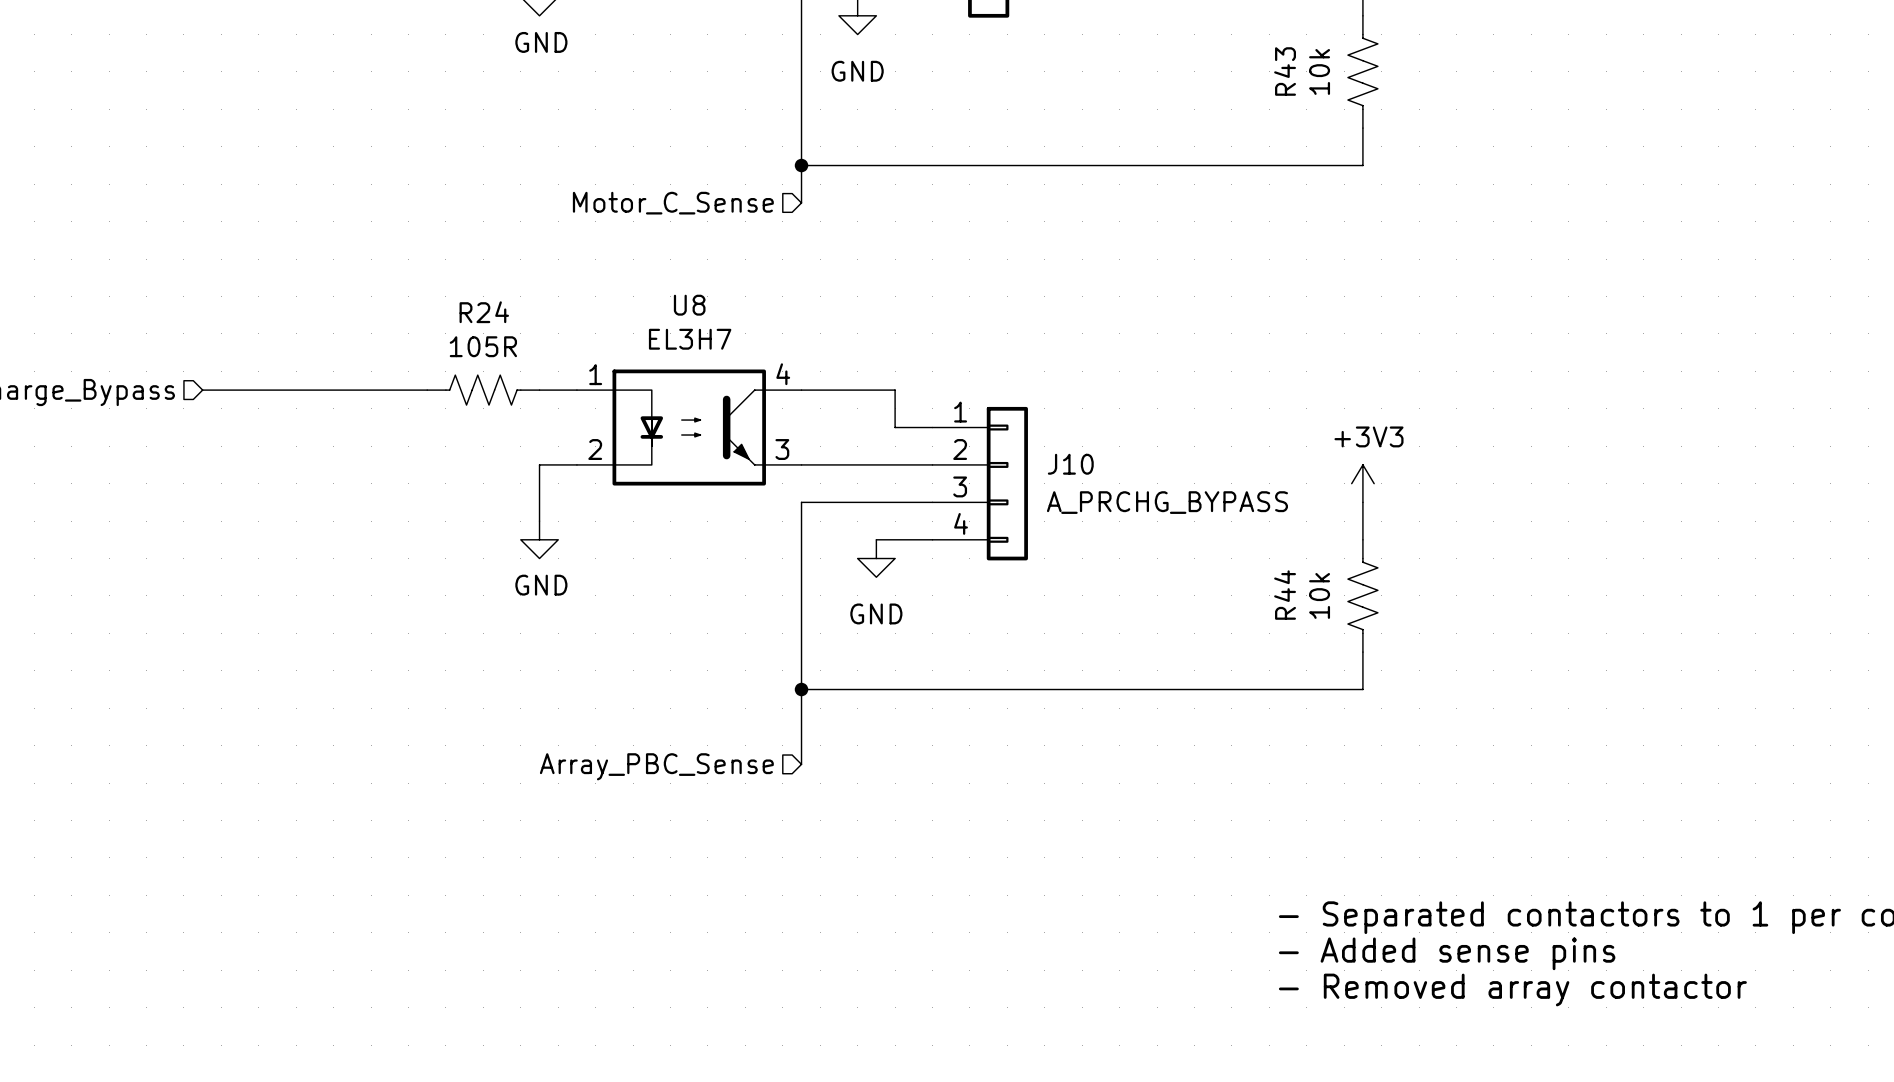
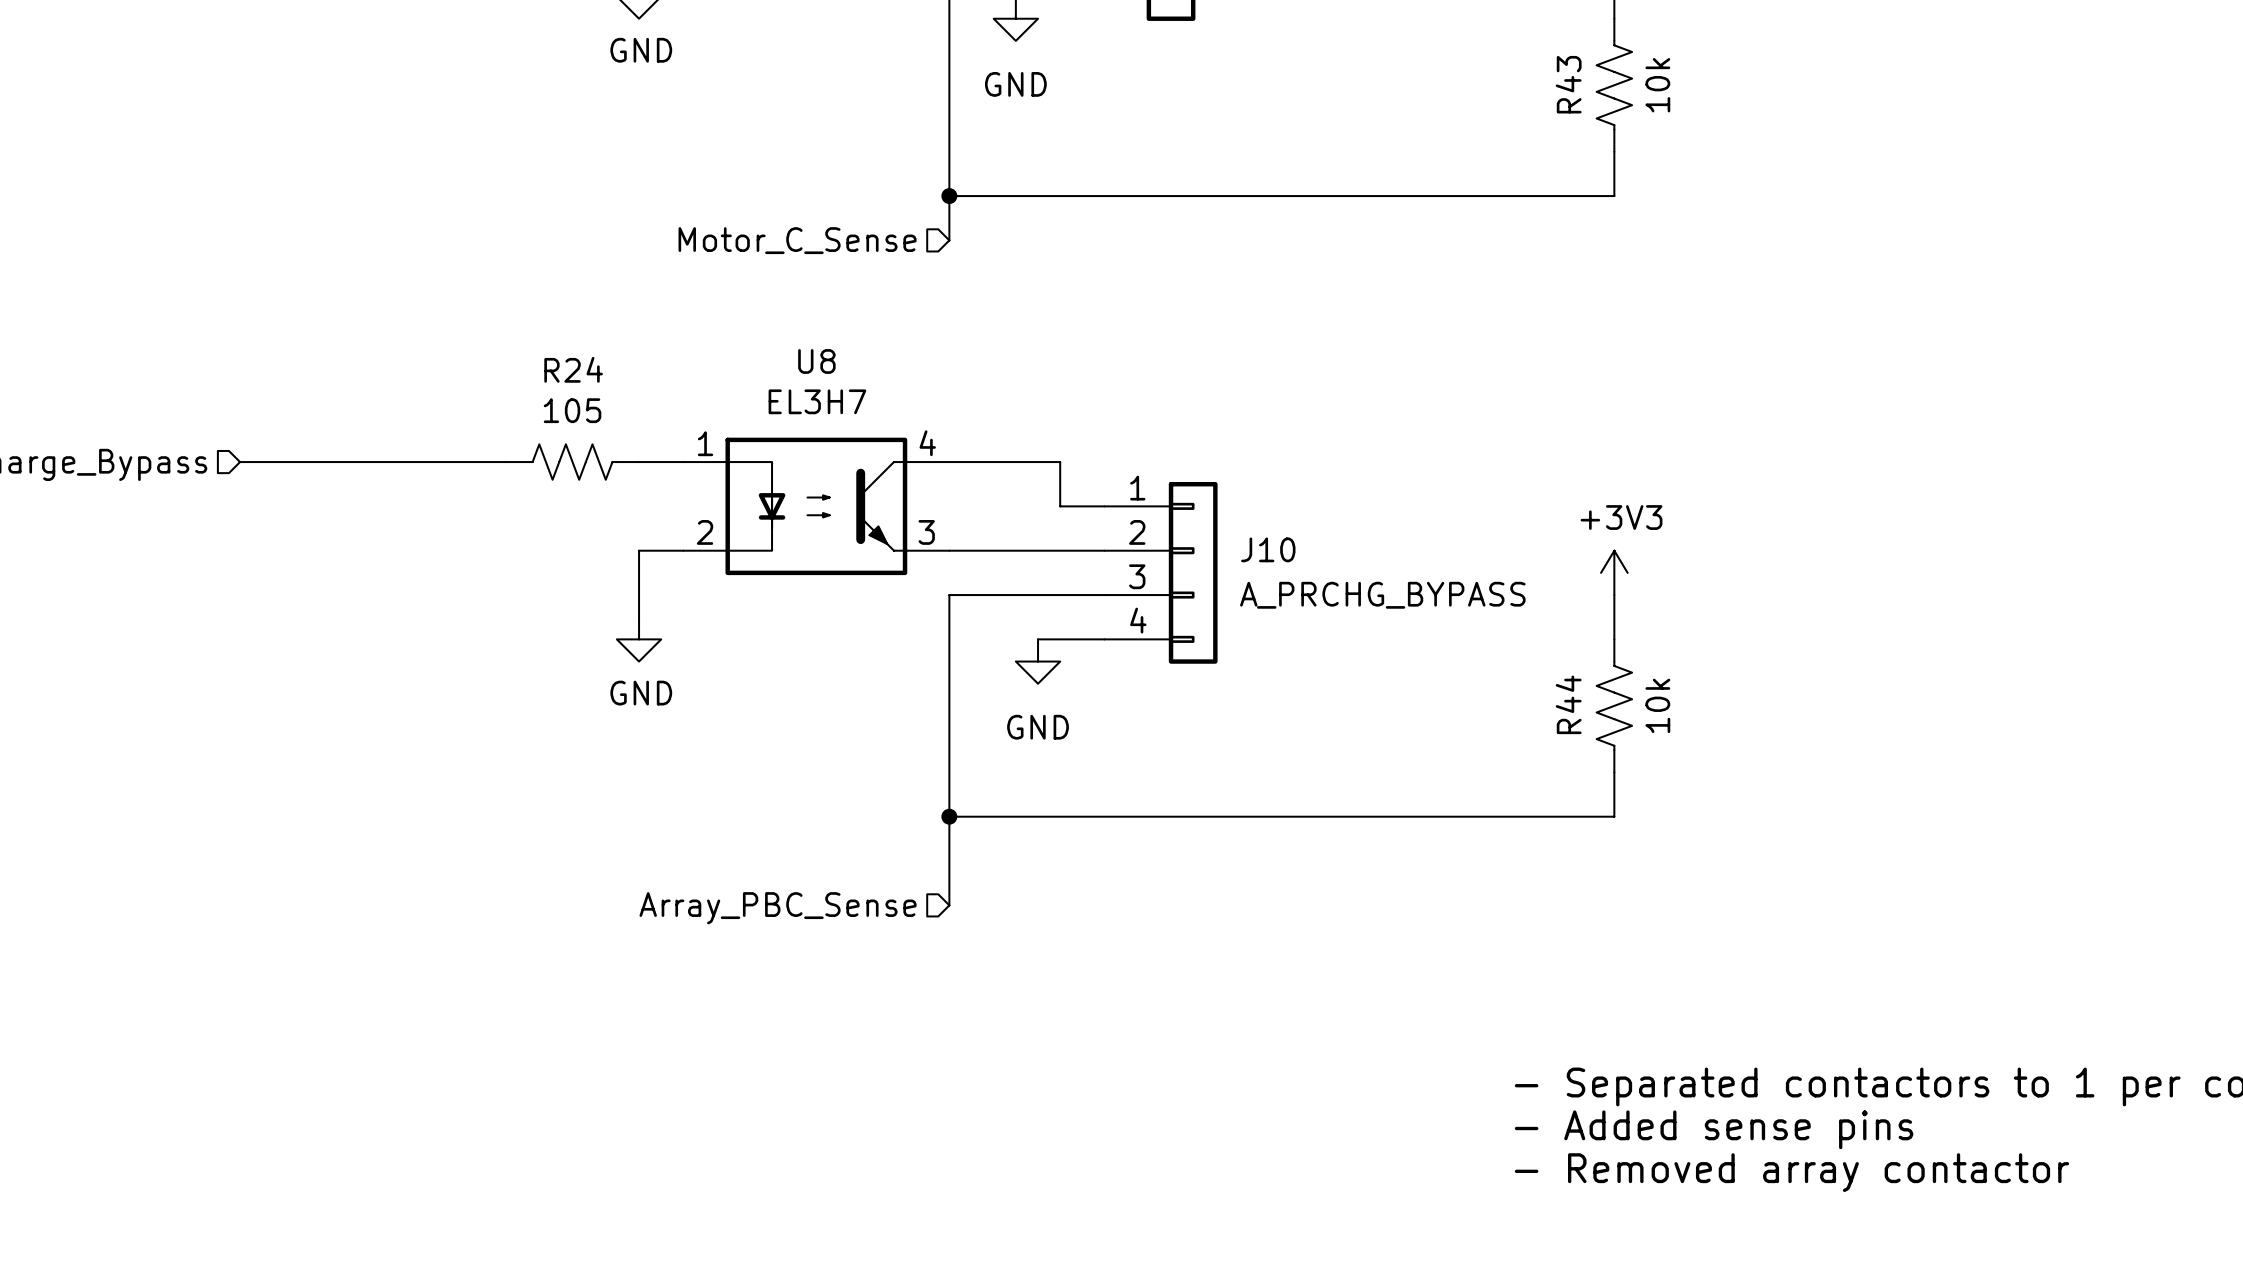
R43 name position: R43 (1285, 71) -> R43 (1568, 84)
R43 value position: 10k (1319, 71) -> 10k (1657, 85)
R24 value: 105R (483, 346) -> 105 (572, 410)
R44 name position: R44 (1285, 595) -> R44 (1568, 704)
R44 value position: 10k (1319, 595) -> 10k (1657, 705)

